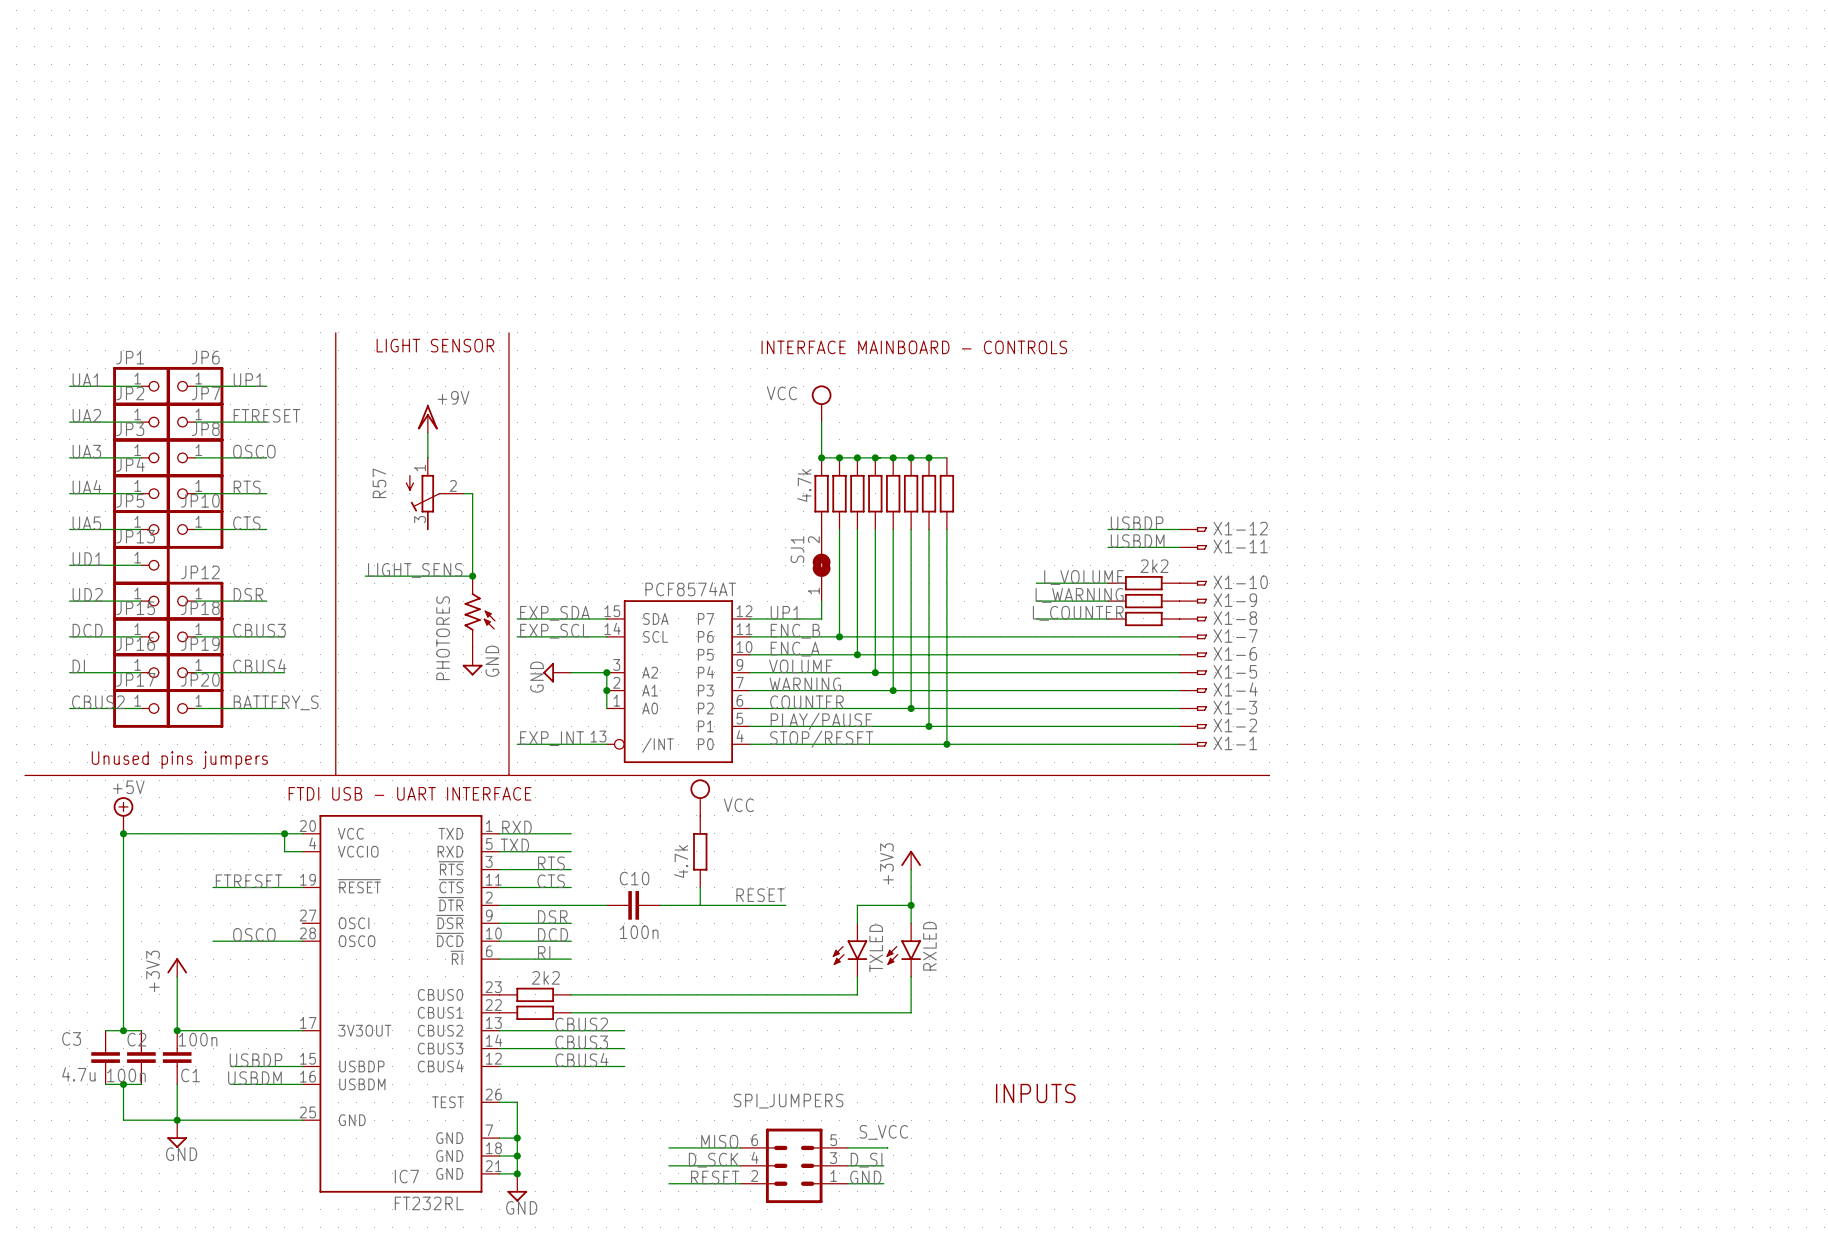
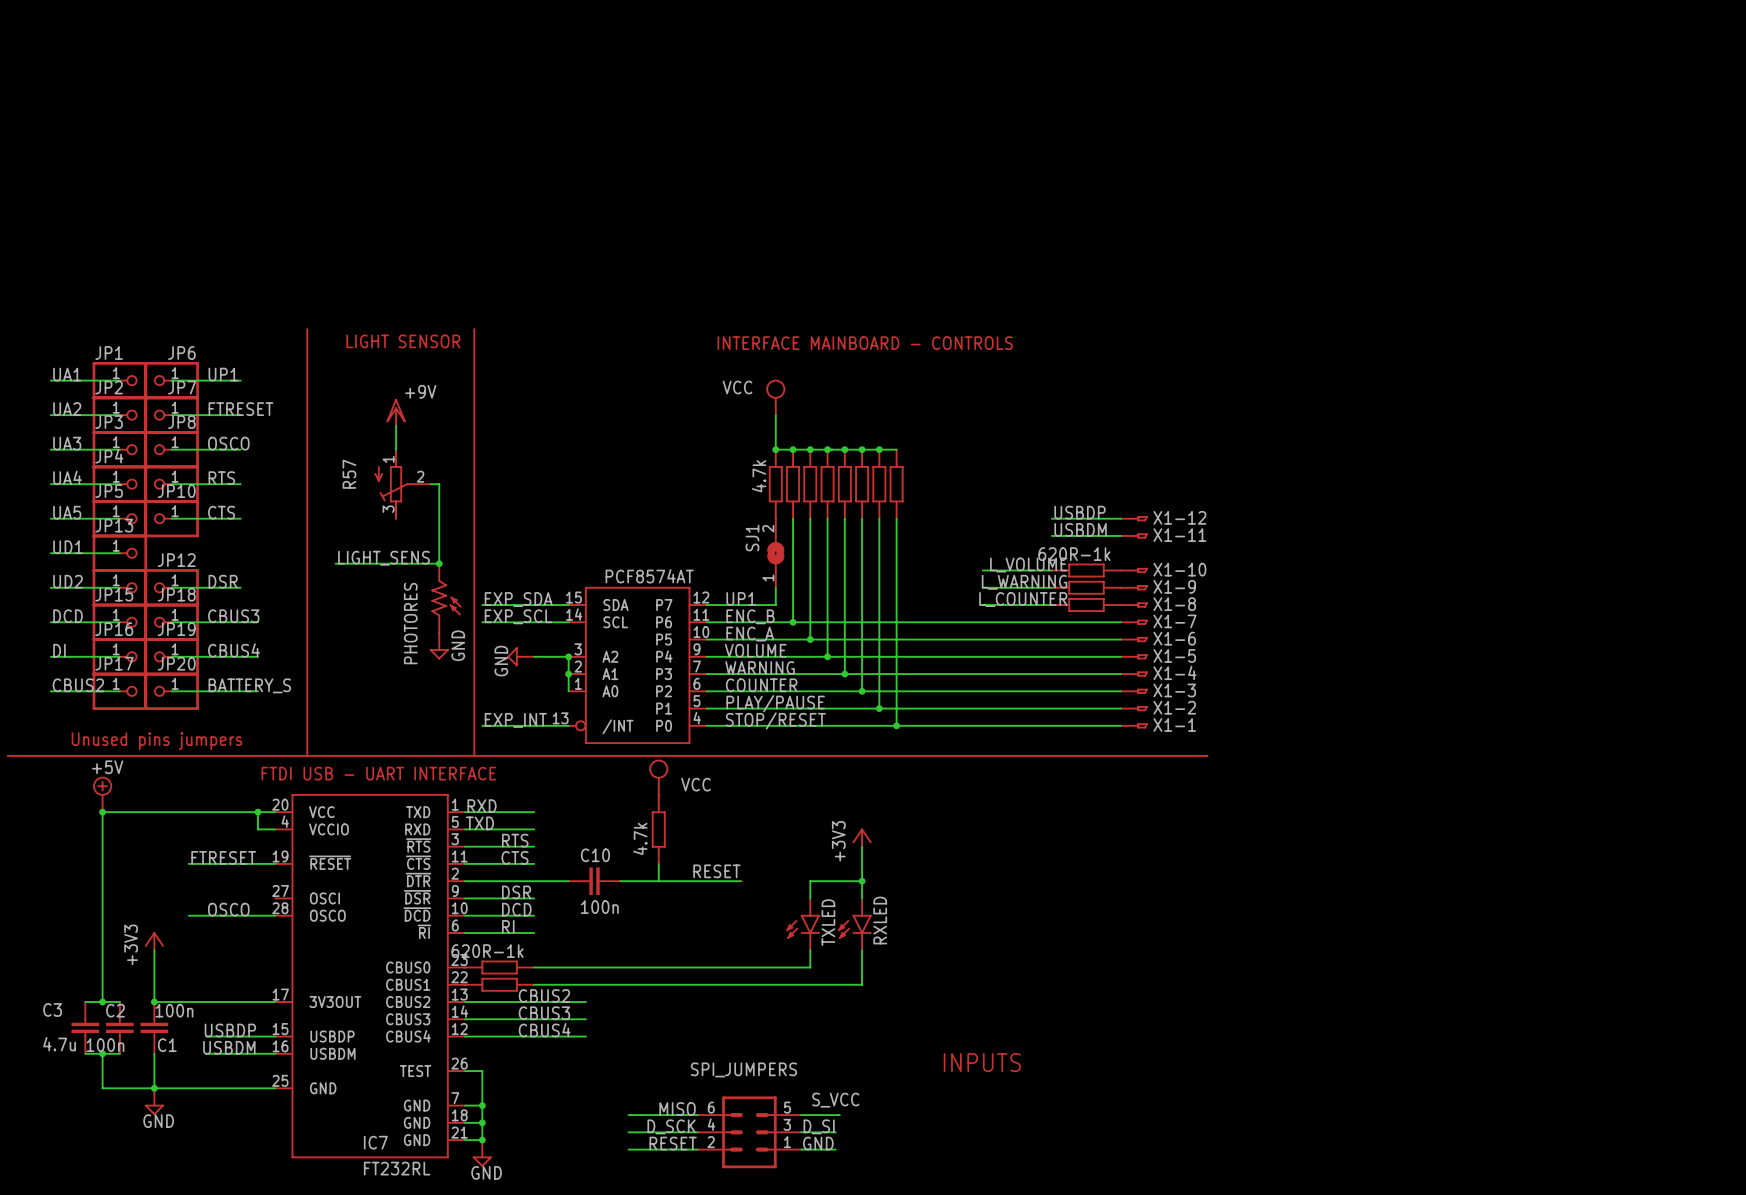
part value: 2k2 (1154, 566) -> 620R-1k (1074, 554)
part value: 2k2 (545, 977) -> 620R-1k (487, 951)

